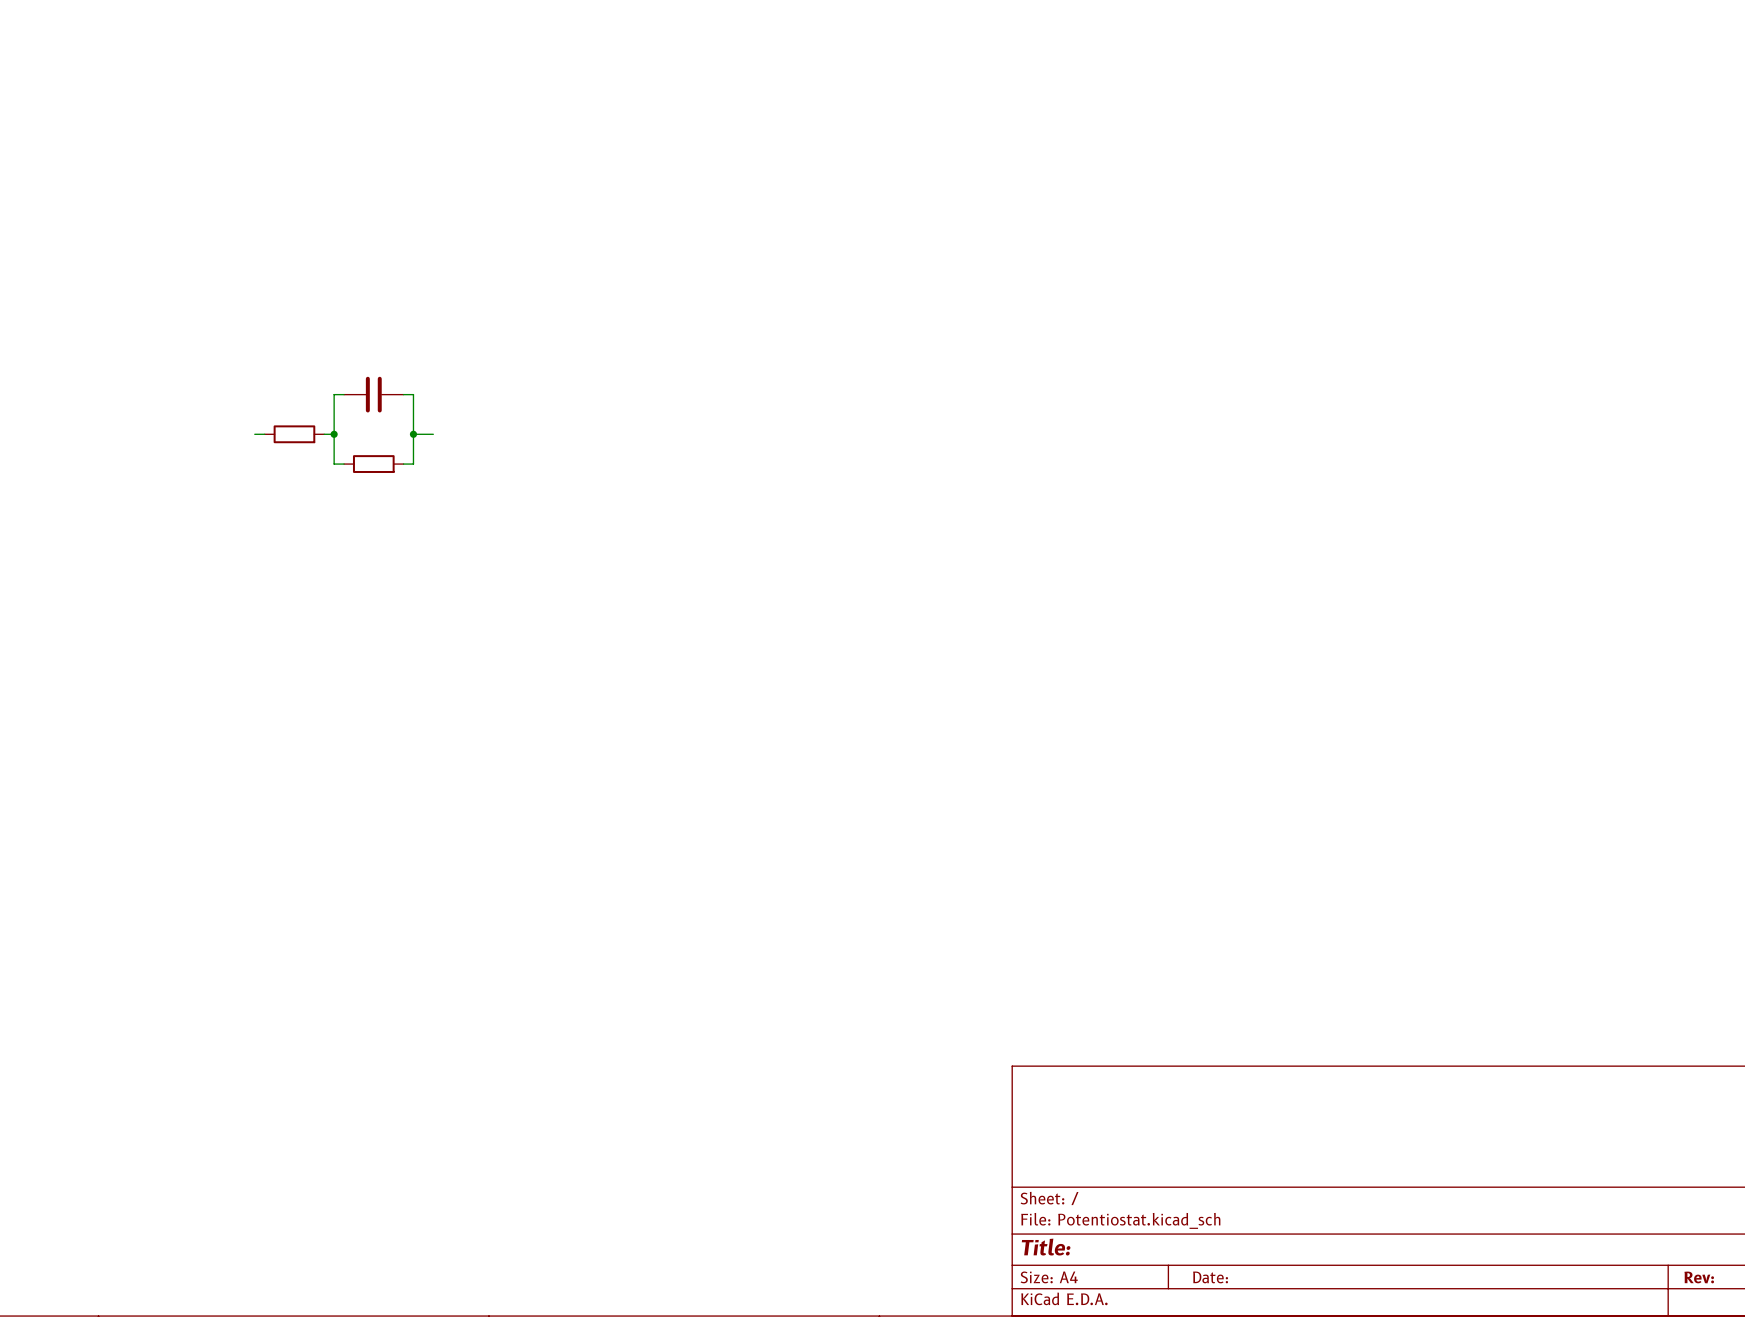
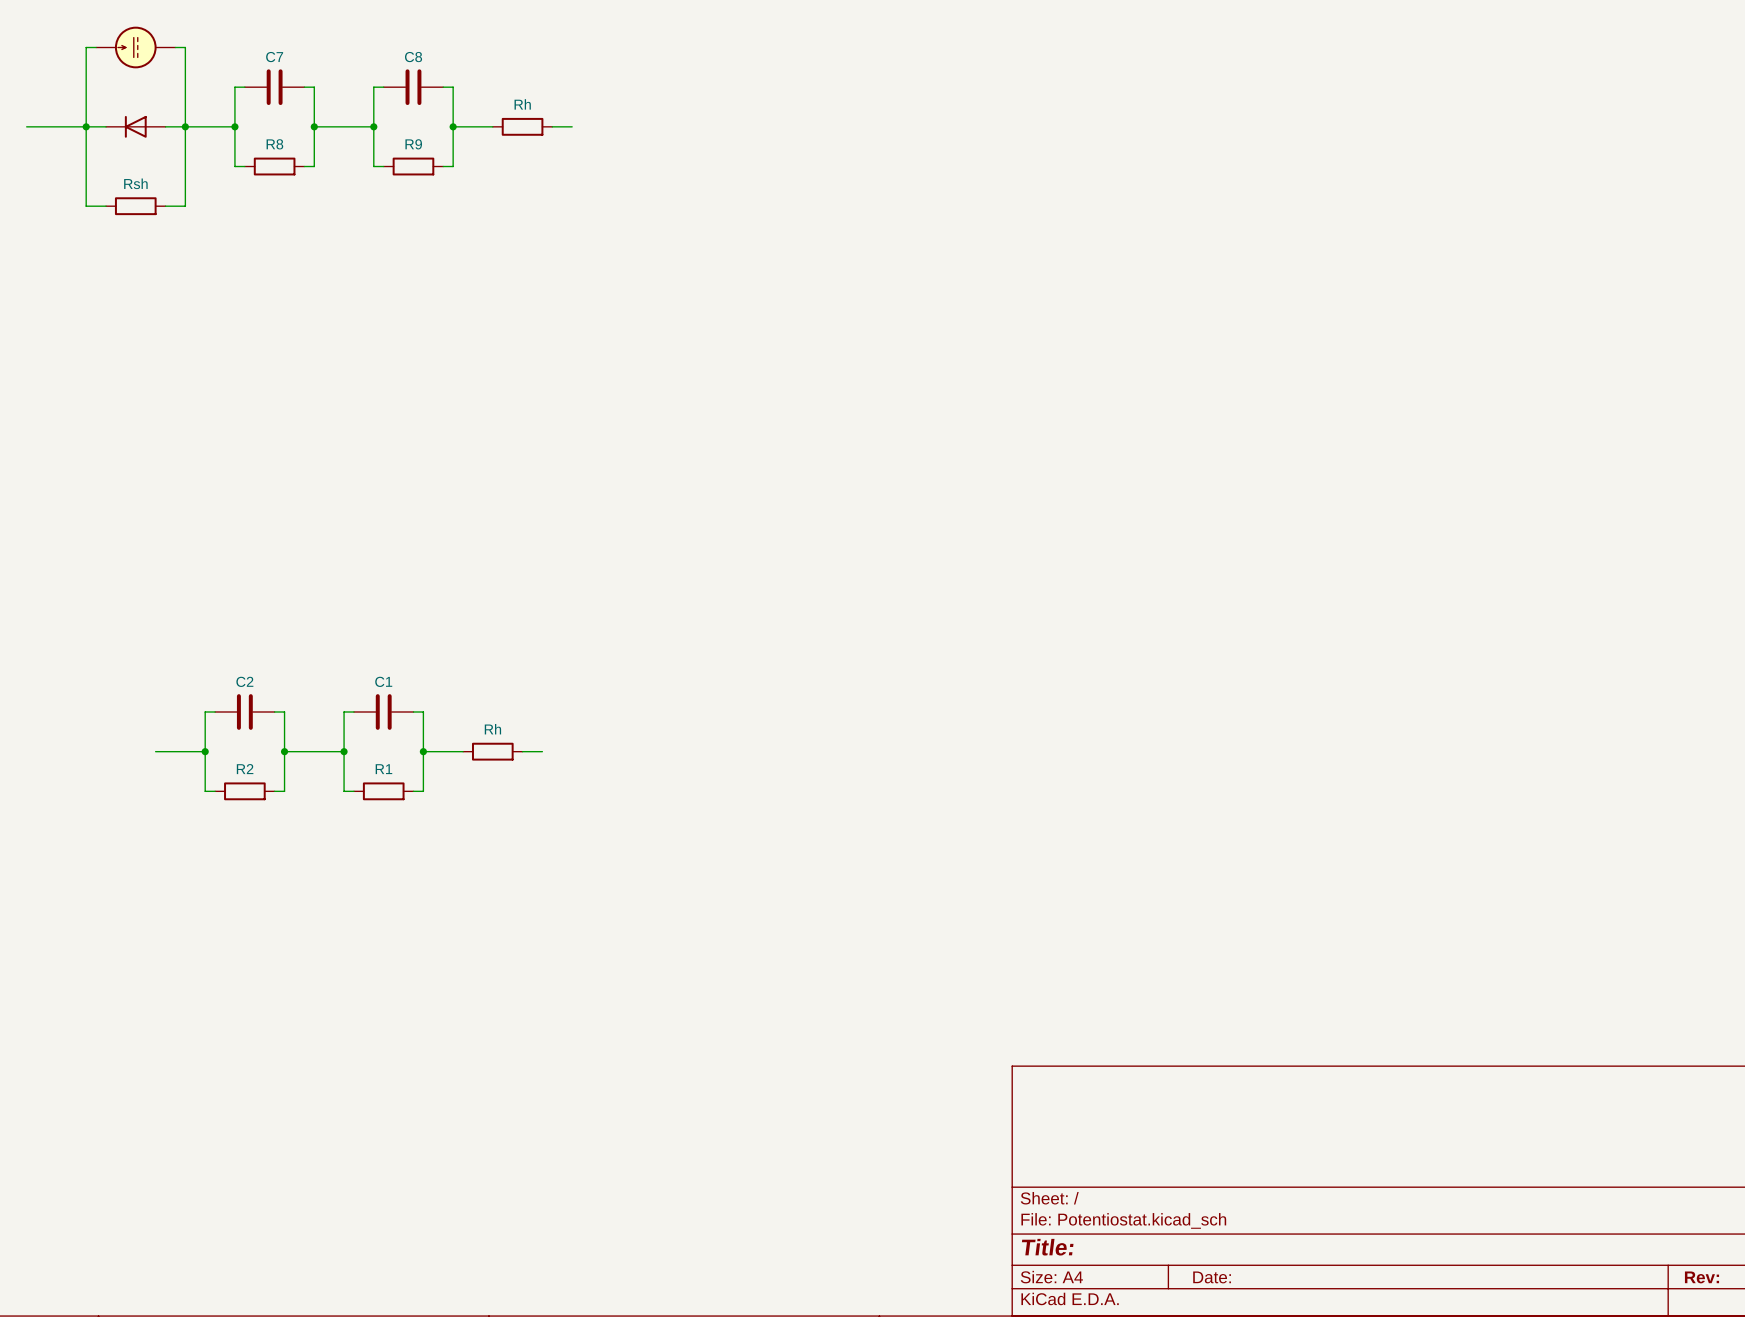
wire: none -> (96, 47) (86, 47) (86, 206) (106, 206)
part: none -> (135, 47)
wire: none -> (175, 47) (185, 47) (185, 206) (165, 206)
wire: none -> (244, 87) (234, 87) (234, 166) (244, 166)
C7: none -> (274, 87)
wire: none -> (304, 87) (314, 87) (314, 166) (304, 166)
wire: none -> (383, 87) (373, 87) (373, 166) (383, 166)
C8: none -> (413, 87)
wire: none -> (443, 87) (453, 87) (453, 166) (443, 166)
wire: none -> (26, 126) (106, 126)
junction: none -> (86, 126)
part: none -> (135, 126)
wire: none -> (165, 126) (234, 126)
junction: none -> (185, 126)
junction: none -> (234, 126)
wire: none -> (314, 126) (373, 126)
junction: none -> (314, 126)
junction: none -> (373, 126)
wire: none -> (453, 126) (492, 126)
junction: none -> (453, 126)
Rh: none -> (522, 126)
wire: none -> (552, 126) (572, 126)
R8: none -> (274, 166)
R9: none -> (413, 166)
Rsh: none -> (135, 206)
wire: (344, 394) (334, 394) (334, 464) (344, 464) -> none
part: (373, 394) -> none
wire: (403, 394) (413, 394) (413, 464) (403, 464) -> none
wire: (254, 434) (264, 434) -> none
part: (294, 434) -> none
wire: (324, 434) (334, 434) -> none
junction: (334, 434) -> none
wire: (413, 434) (433, 434) -> none
junction: (413, 434) -> none
part: (373, 464) -> none
wire: none -> (215, 711) (205, 711) (205, 791) (215, 791)
C2: none -> (244, 711)
wire: none -> (274, 711) (284, 711) (284, 791) (274, 791)
wire: none -> (353, 711) (344, 711) (344, 791) (353, 791)
C1: none -> (383, 711)
wire: none -> (413, 711) (423, 711) (423, 791) (413, 791)
wire: none -> (155, 751) (205, 751)
junction: none -> (205, 751)
wire: none -> (284, 751) (344, 751)
junction: none -> (284, 751)
junction: none -> (344, 751)
wire: none -> (423, 751) (463, 751)
junction: none -> (423, 751)
Rh: none -> (492, 751)
wire: none -> (522, 751) (542, 751)
R2: none -> (244, 791)
R1: none -> (383, 791)

